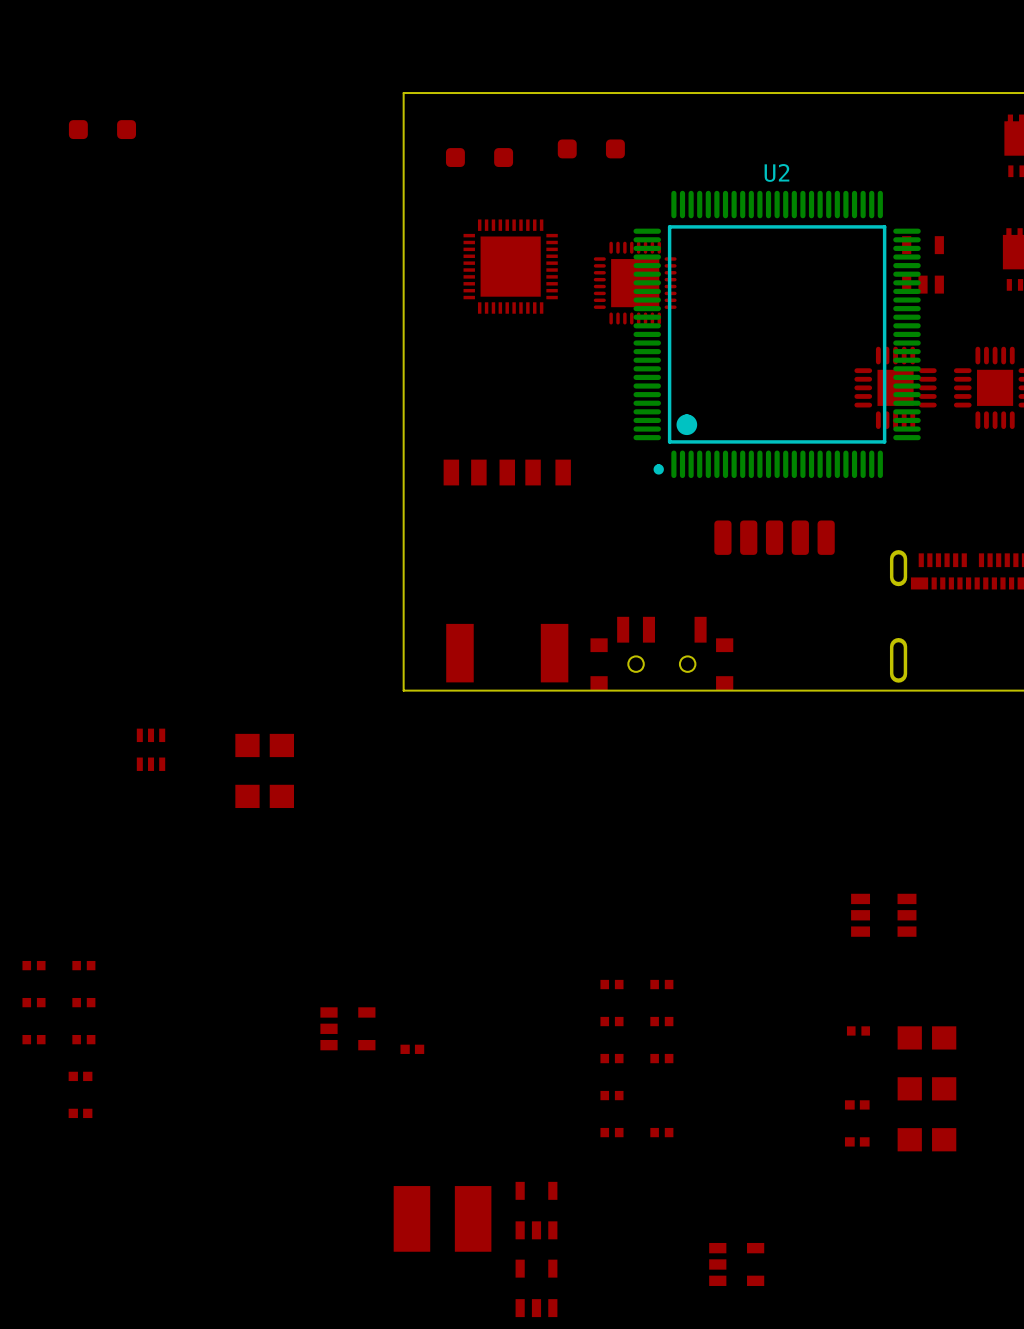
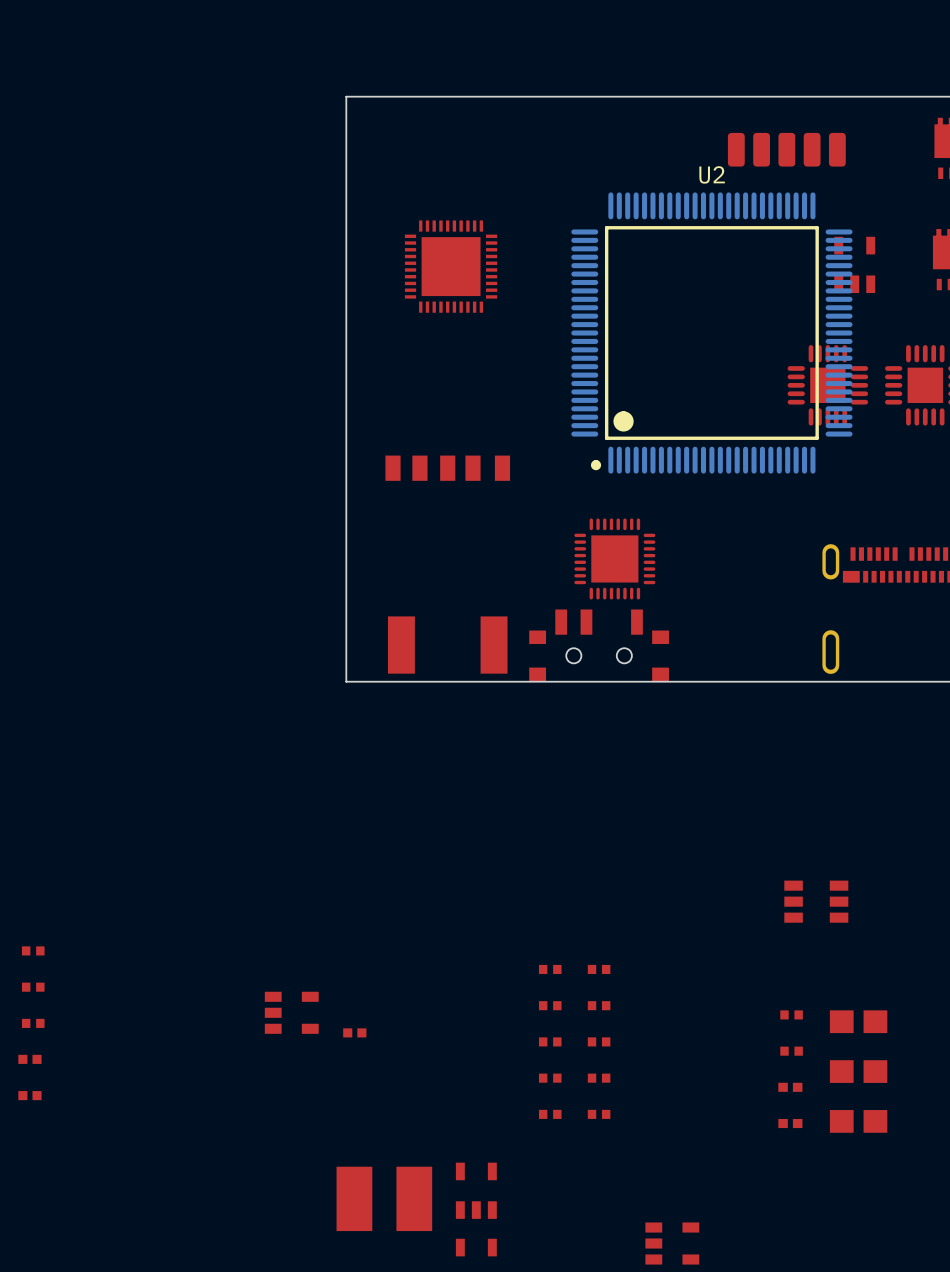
part: (102, 129) -> none
part: (591, 148) -> none
part: (479, 157) -> none
part position: (635, 283) -> (614, 558)
part position: (774, 537) -> (786, 149)
part: (264, 745) -> none
part: (151, 749) -> none
part: (264, 796) -> none
part: none -> (791, 1051)
part: none -> (599, 1078)

